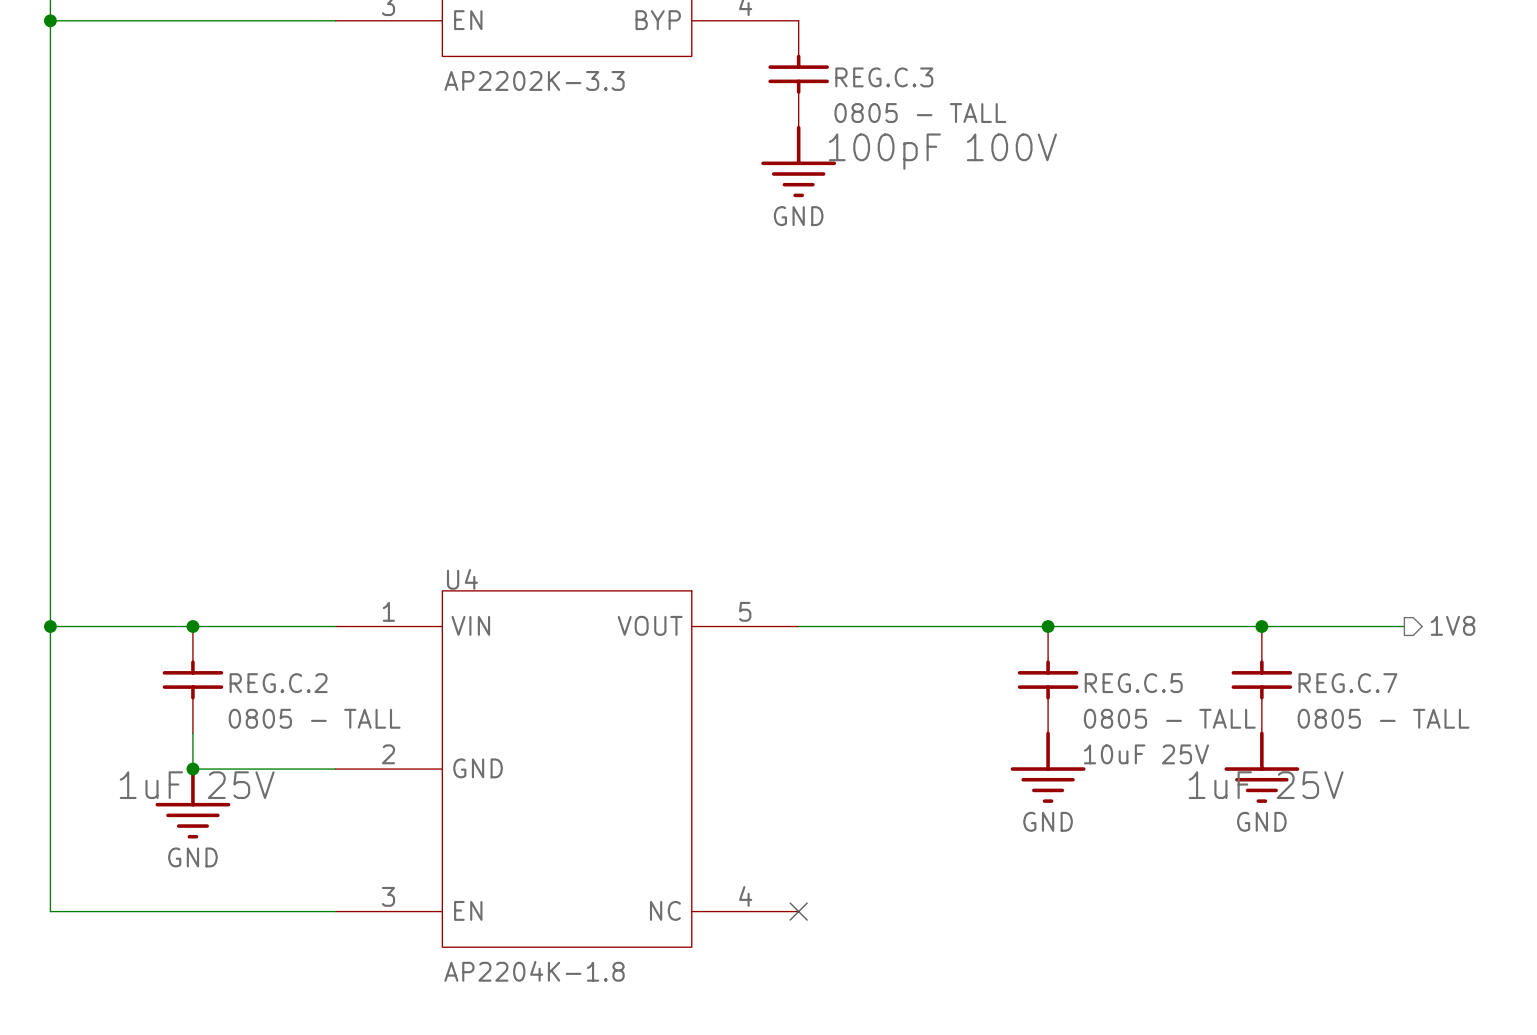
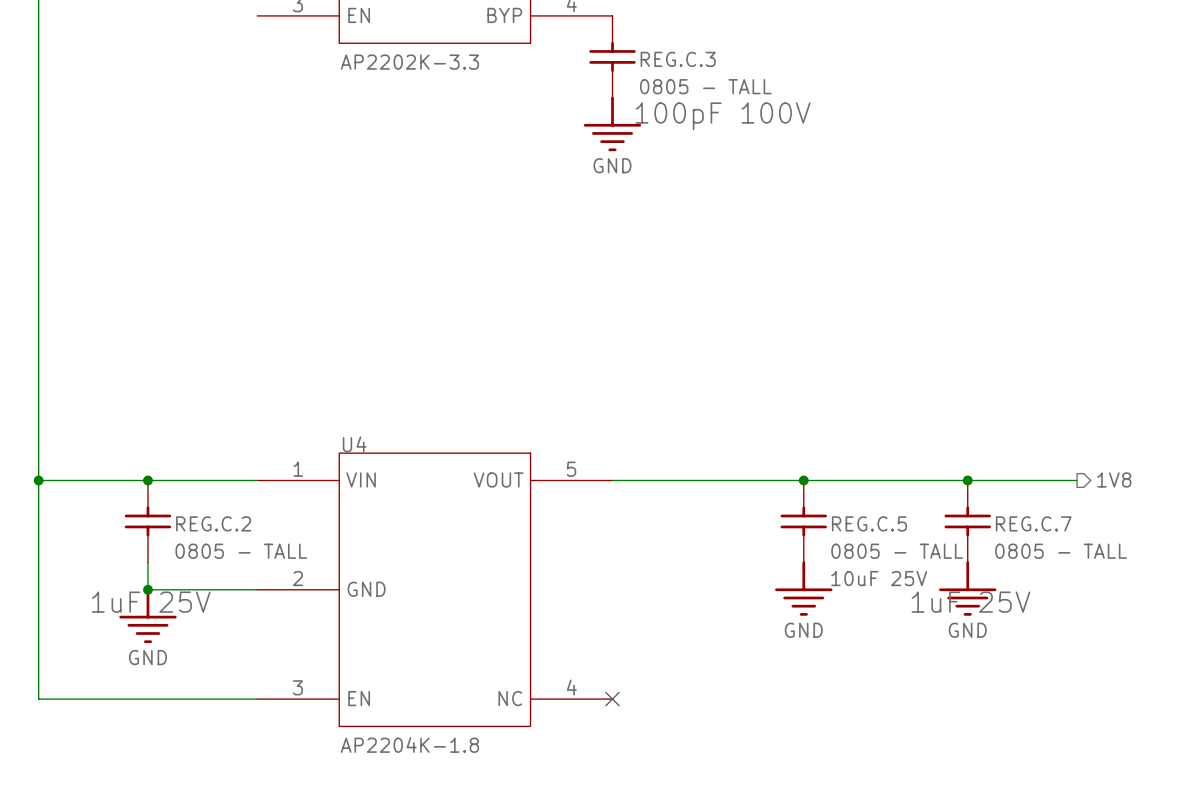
wire: (50, 20) (335, 20) -> none
junction: (50, 20) -> none

